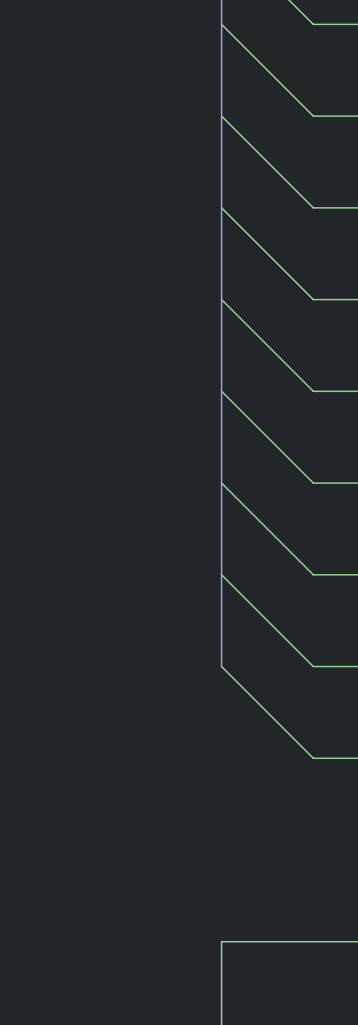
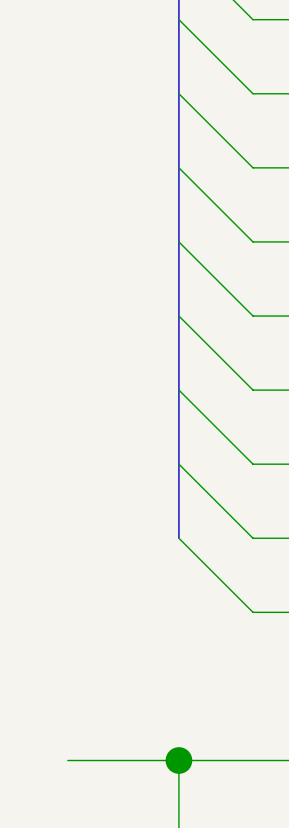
wire: none -> (67, 760) (178, 760)
junction: none -> (178, 760)

